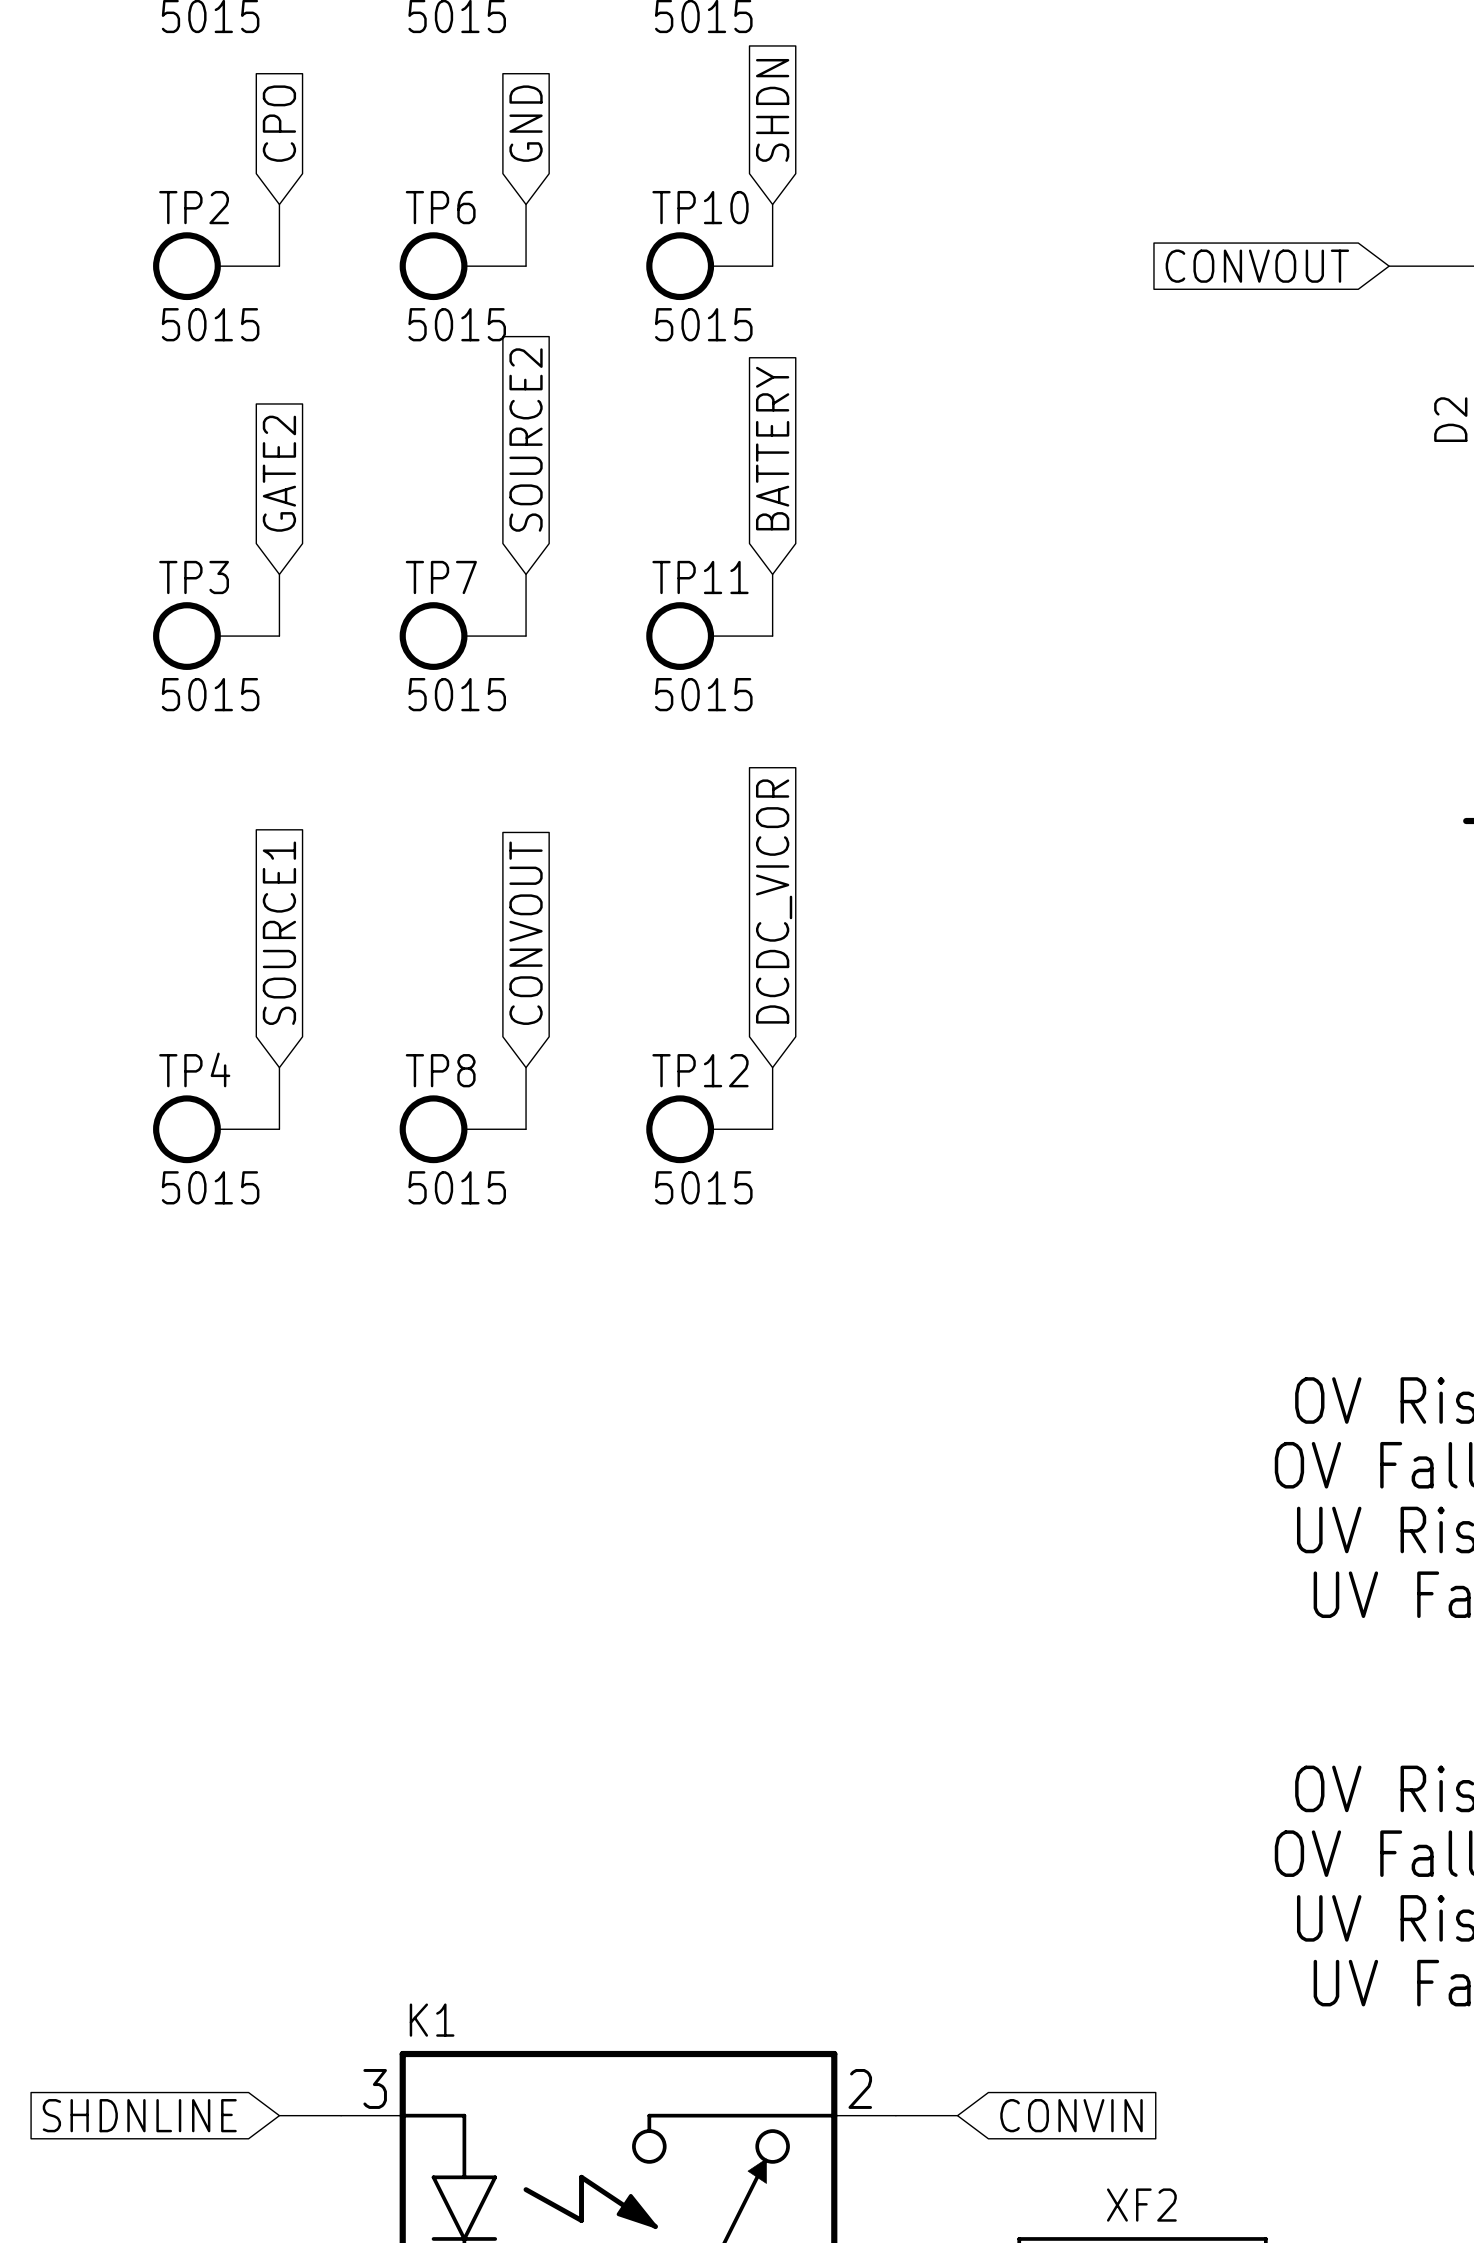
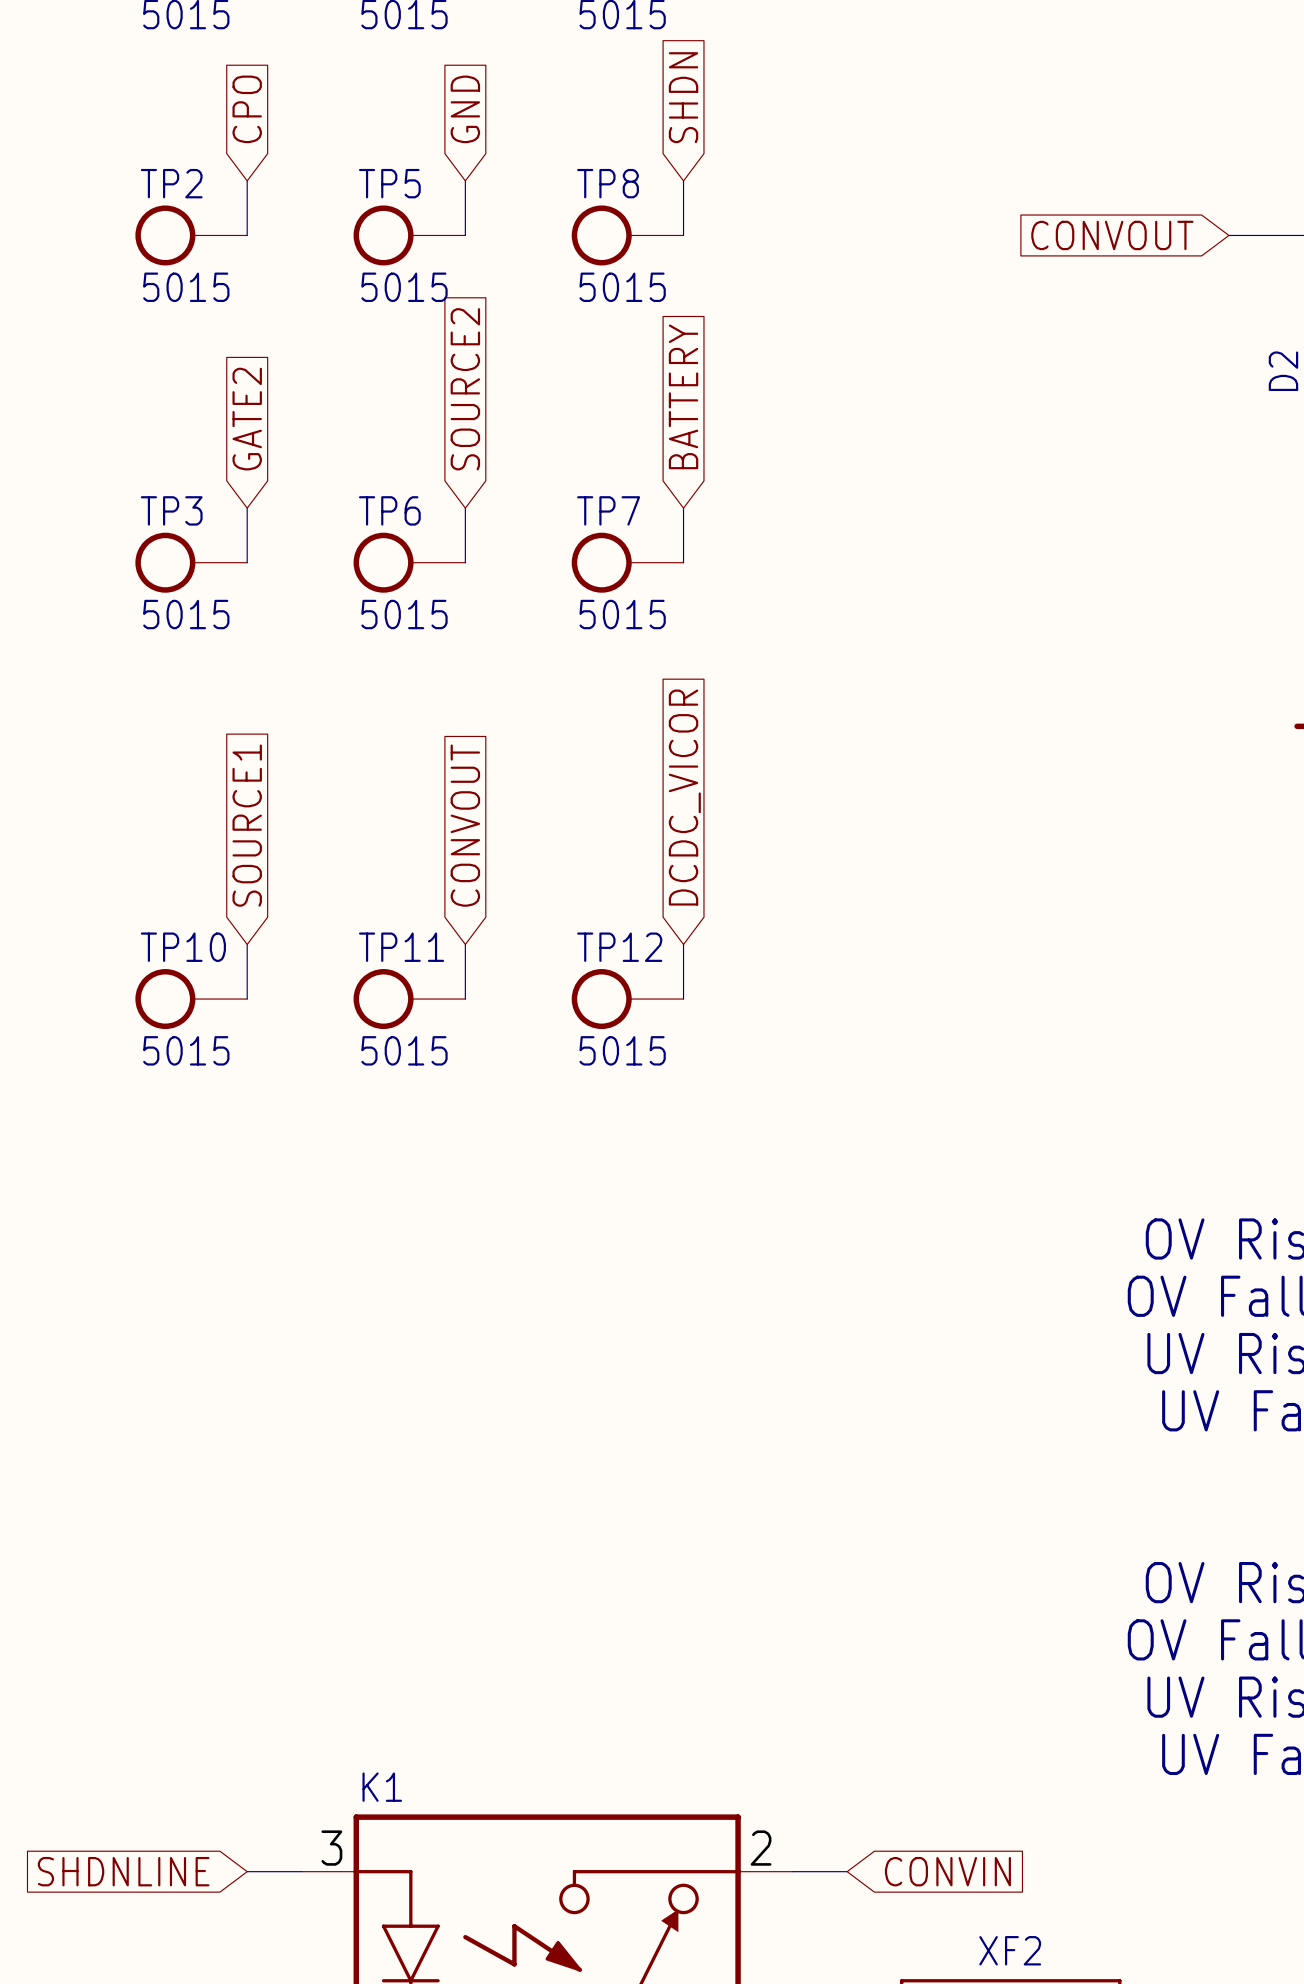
TP6 name: TP6 (440, 207) -> TP5 (389, 183)
TP10 name: TP10 (700, 207) -> TP8 (608, 183)
TP7 name: TP7 (441, 577) -> TP6 (389, 510)
TP11 name: TP11 (700, 577) -> TP7 (608, 510)
TP4 name: TP4 (194, 1069) -> TP10 (183, 947)
TP8 name: TP8 (440, 1070) -> TP11 (401, 947)

